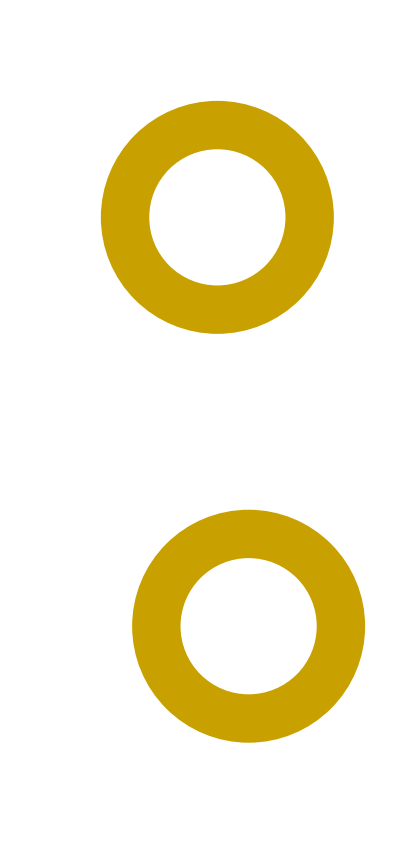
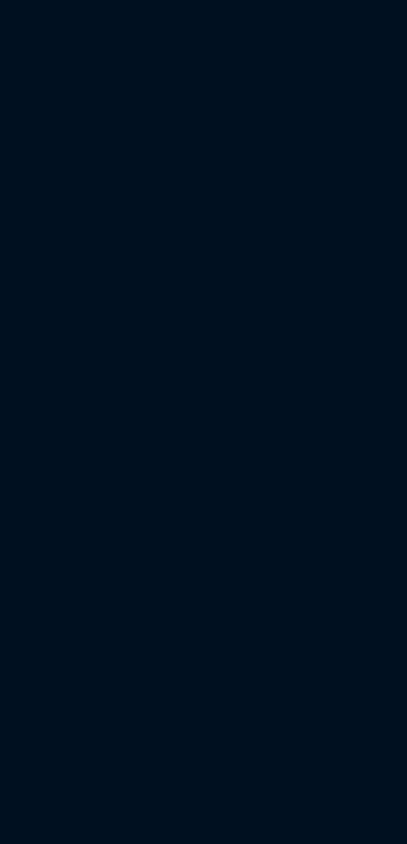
part: (217, 217) -> none
part: (248, 626) -> none

